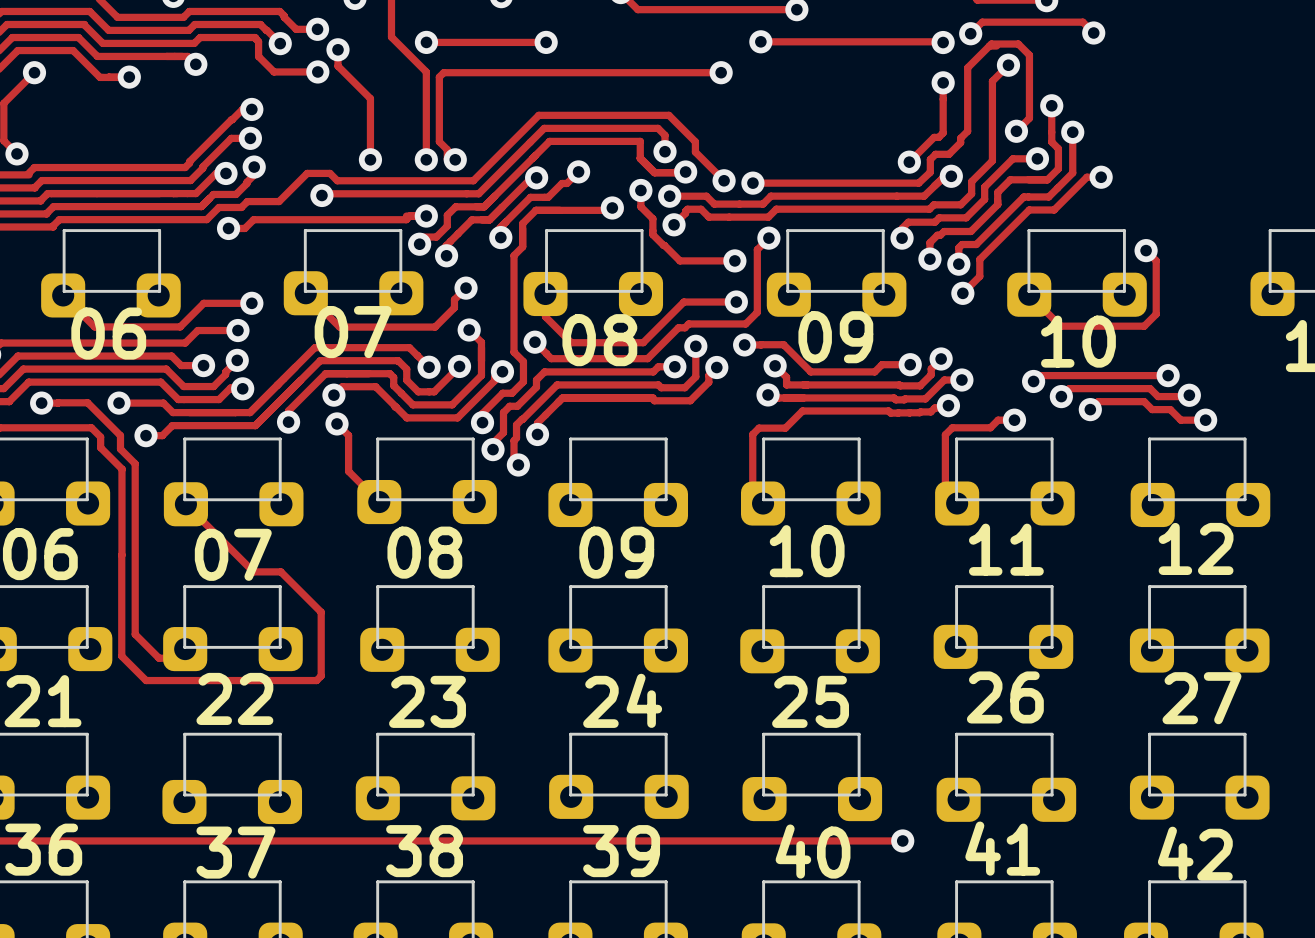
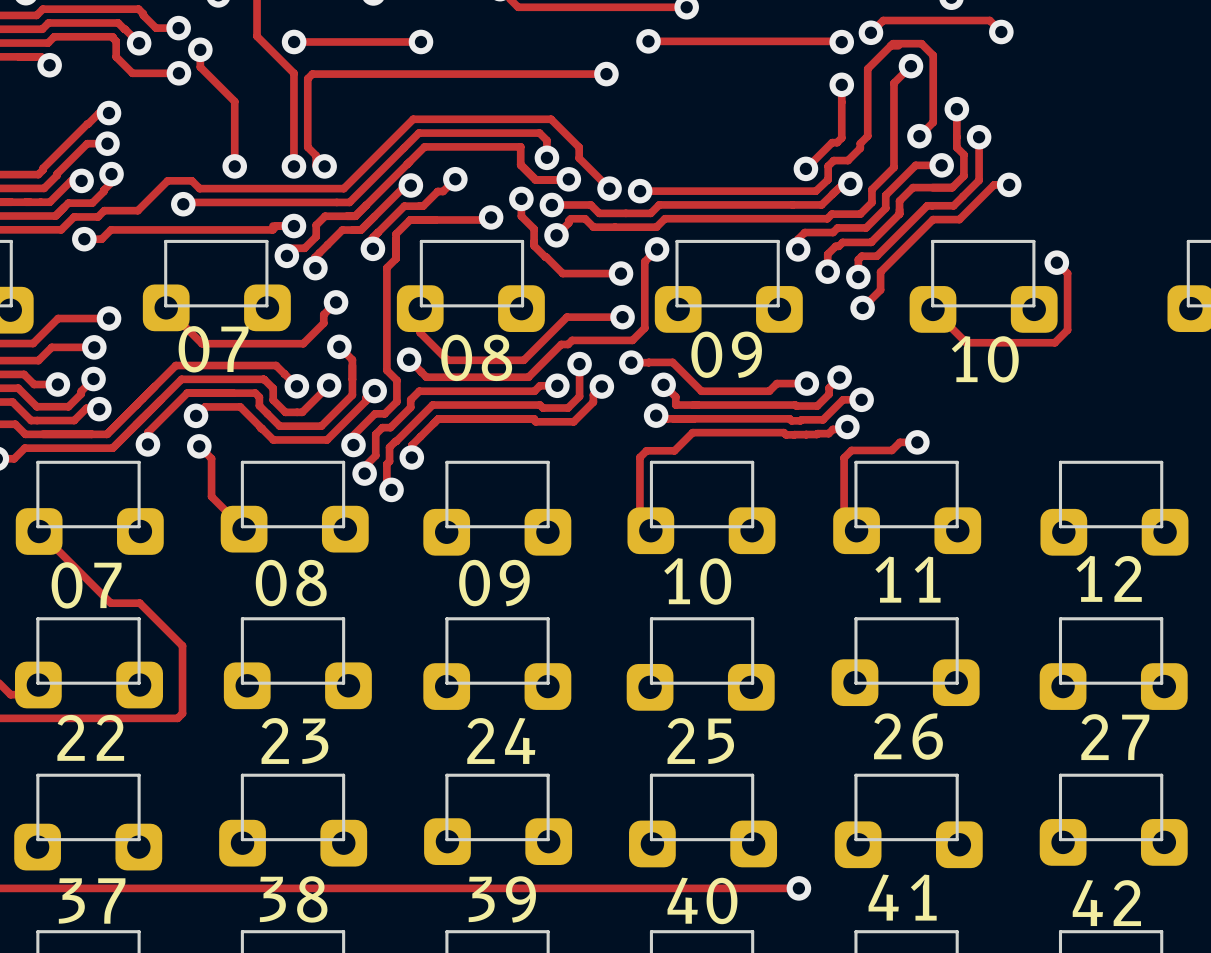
track: (1168, 375) (1039, 375) (1033, 381) -> none
via: (1168, 375) -> none
via: (1033, 381) -> none
track: (1189, 395) (1158, 396) (1150, 388) (1069, 388) (1061, 396) -> none
via: (1189, 395) -> none
via: (1061, 396) -> none
track: (1090, 409) (1098, 401) (1144, 401) (1152, 409) (1170, 409) (1180, 420) (1205, 420) -> none
via: (1090, 409) -> none
via: (1205, 420) -> none

